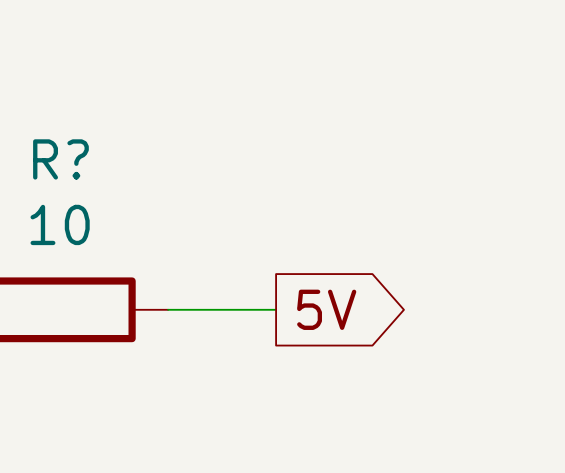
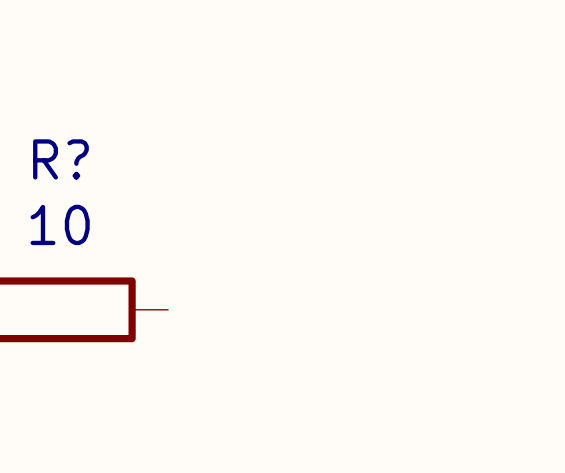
wire: (168, 309) (276, 309) -> none
global label: 5V (326, 309) -> none

